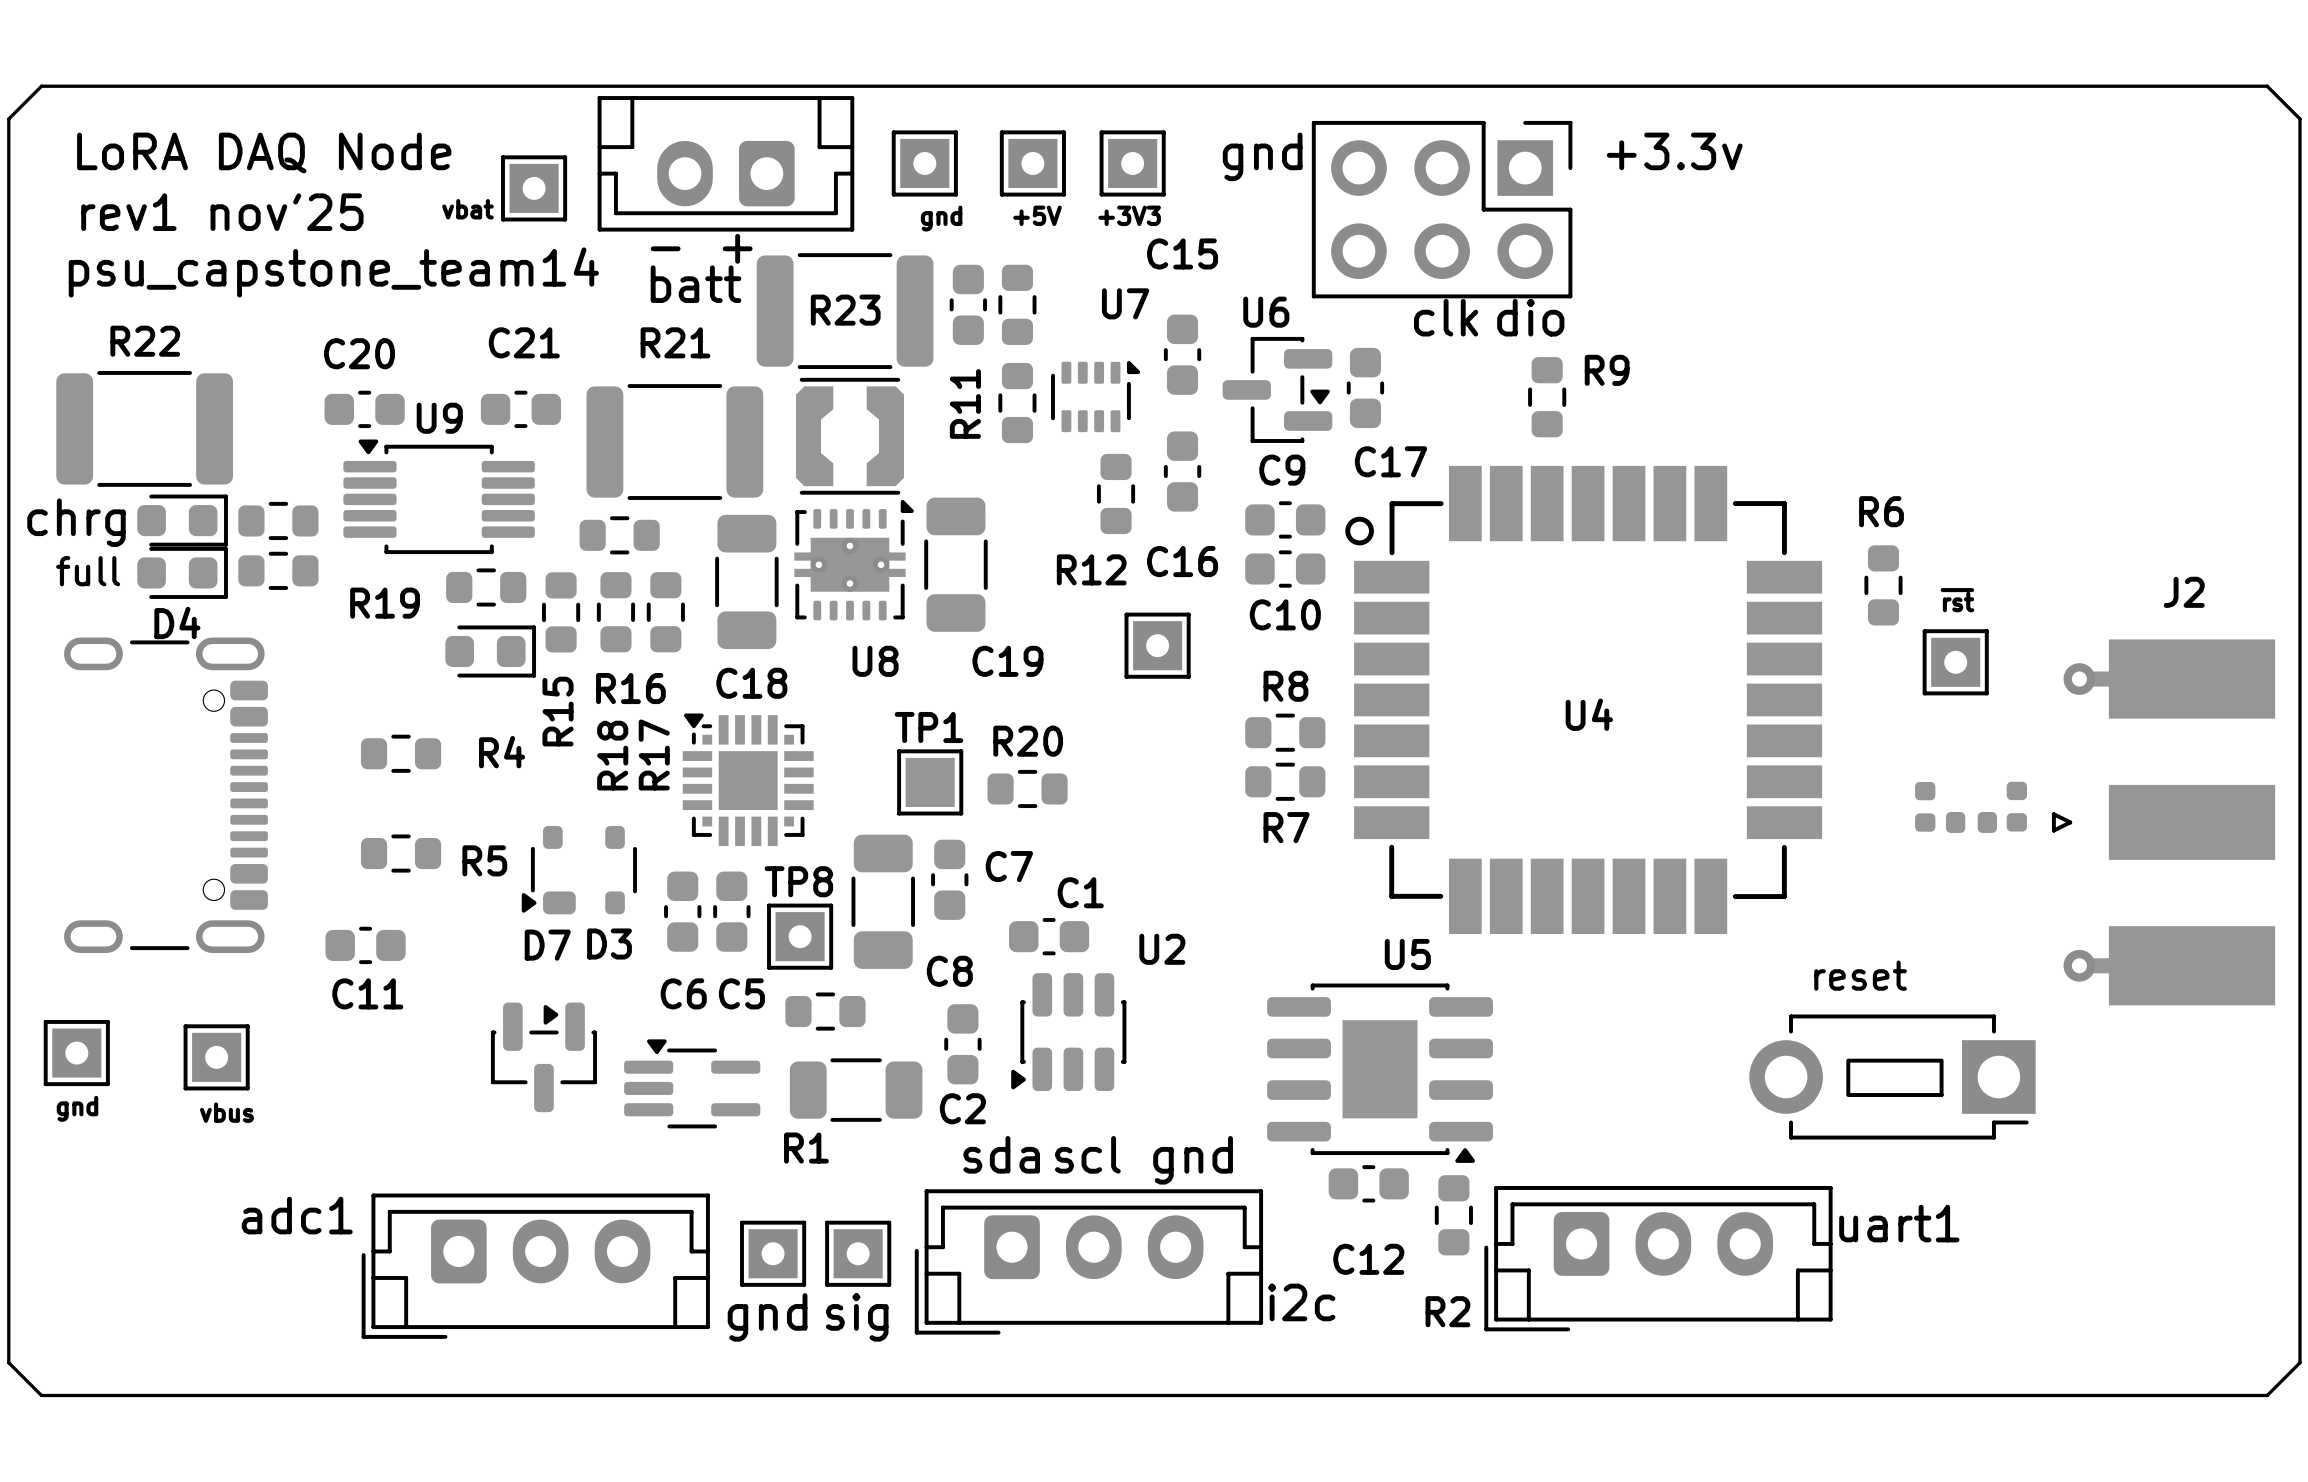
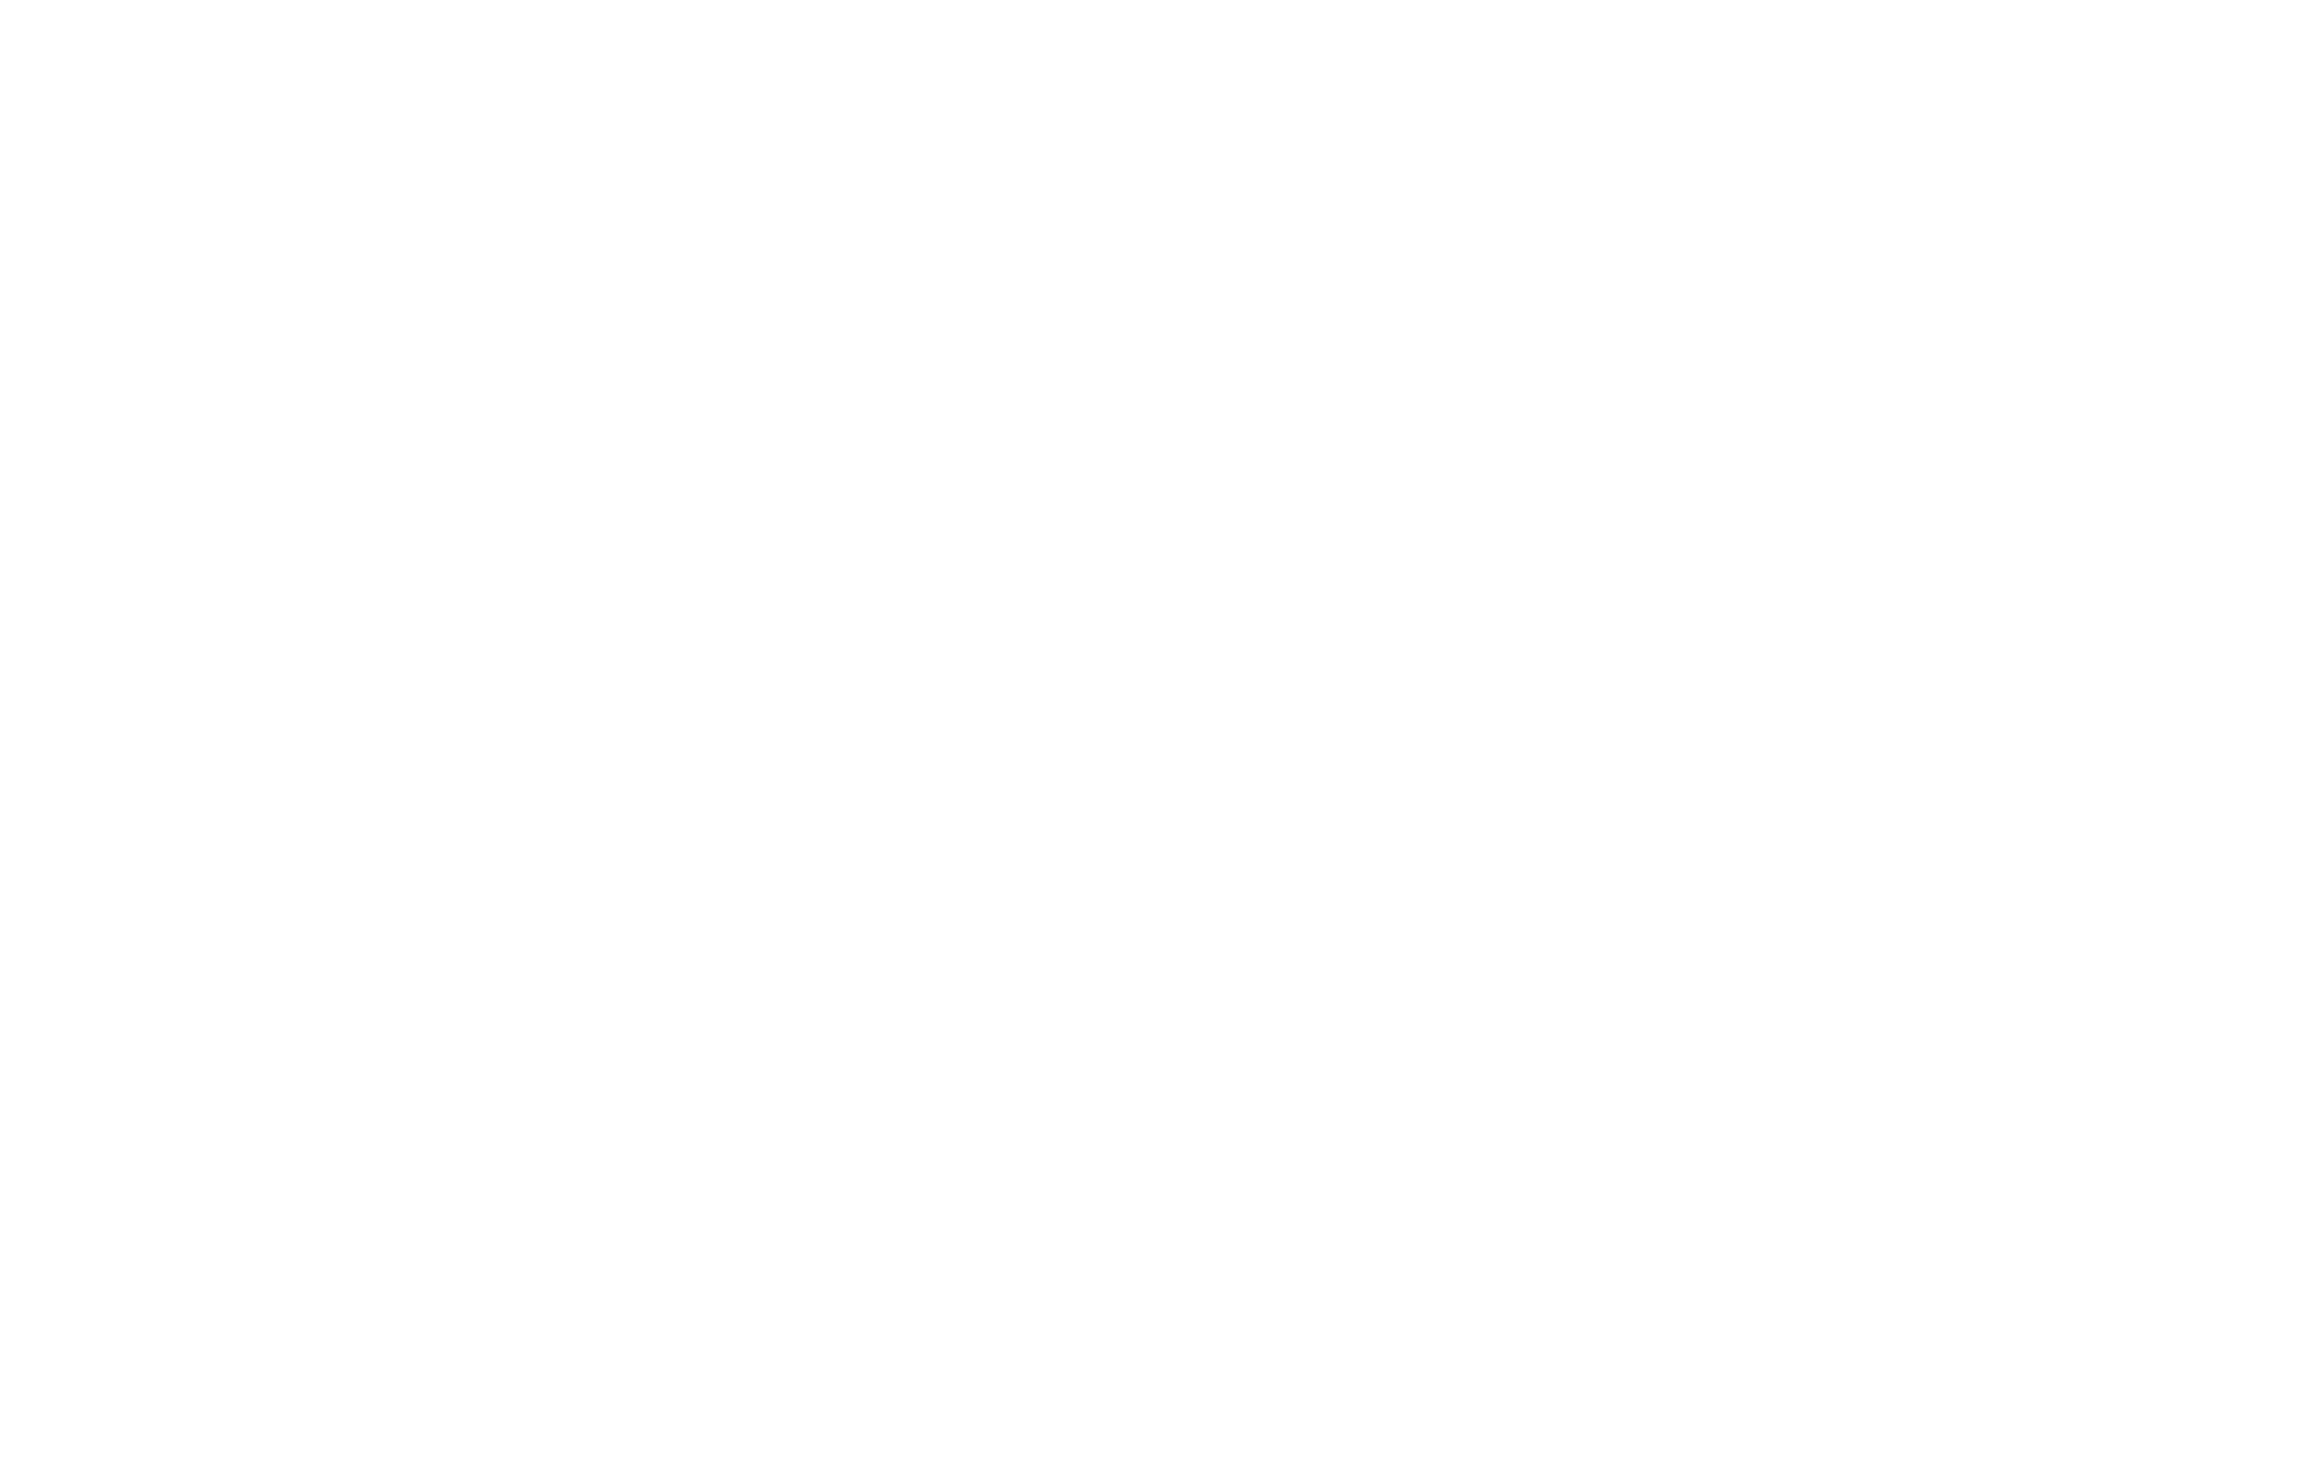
board edge: (41, 86) (8, 118) (8, 1362) (41, 1395) (2267, 1395) (2299, 1362) (2299, 118) (2267, 86) (41, 86) -> none
text: +3.3v (1674, 151) -> none
text: LoRA DAQ Node (264, 152) -> none
text: gnd (1262, 156) -> none
part: (725, 163) -> none
part: (924, 163) -> none
part: (1032, 163) -> none
part: (1132, 163) -> none
part: (534, 188) -> none
text: vbat (468, 209) -> none
part: (1442, 209) -> none
text: rev1 nov'25 (222, 212) -> none
text: +5V (1037, 215) -> none
text: +3V3 (1129, 215) -> none
text: gnd (941, 218) -> none
text: - (665, 248) -> none
text: + (737, 248) -> none
text: psu_capstone_team14 (333, 272) -> none
text: batt (696, 284) -> none
part: (968, 304) -> none
part: (1017, 304) -> none
R23: (845, 311) -> none
text: clk (1446, 317) -> none
text: dio (1530, 317) -> none
C15: (1182, 354) -> none
C17: (1365, 387) -> none
U6: (1277, 389) -> none
U7: (1095, 396) -> none
R9: (1547, 397) -> none
R11: (1017, 403) -> none
C20: (364, 409) -> none
C21: (520, 409) -> none
R22: (144, 428) -> none
part: (849, 436) -> none
R21: (674, 442) -> none
C16: (1182, 471) -> none
R12: (1116, 493) -> none
U9: (439, 496) -> none
C9: (1285, 519) -> none
part: (182, 520) -> none
part: (278, 520) -> none
text: chrg (76, 522) -> none
R16: (619, 535) -> none
U8: (854, 560) -> none
C19: (955, 564) -> none
C10: (1285, 569) -> none
part: (278, 570) -> none
text: full (88, 571) -> none
D4: (182, 572) -> none
C18: (746, 581) -> none
R6: (1883, 585) -> none
R19: (486, 587) -> none
text: ~{rst} (1957, 600) -> none
R15: (561, 612) -> none
R18: (615, 612) -> none
R17: (665, 612) -> none
part: (1157, 645) -> none
part: (490, 651) -> none
part: (1955, 662) -> none
U4: (1583, 699) -> none
R8: (1285, 732) -> none
R4: (401, 753) -> none
part: (748, 779) -> none
R7: (1285, 781) -> none
TP1: (930, 782) -> none
R20: (1027, 788) -> none
part: (165, 795) -> none
part: (1925, 806) -> none
part: (2016, 806) -> none
part: (1971, 822) -> none
J2: (2163, 822) -> none
R5: (401, 853) -> none
D3: (579, 870) -> none
C7: (949, 879) -> none
C8: (883, 901) -> none
C6: (682, 911) -> none
C5: (731, 911) -> none
TP8: (800, 936) -> none
C1: (1049, 936) -> none
C11: (365, 945) -> none
text: reset (1860, 975) -> none
part: (825, 1011) -> none
U2: (1068, 1032) -> none
C2: (962, 1044) -> none
part: (76, 1053) -> none
part: (216, 1057) -> none
D7: (543, 1057) -> none
U5: (1380, 1073) -> none
part: (1892, 1077) -> none
part: (692, 1083) -> none
R1: (856, 1090) -> none
text: gnd (77, 1108) -> none
text: vbus (226, 1112) -> none
text: sda (1001, 1154) -> none
text: scl (1087, 1154) -> none
text: gnd (1193, 1160) -> none
C12: (1368, 1183) -> none
text: adc1 (297, 1215) -> none
R2: (1453, 1215) -> none
text: uart1 (1899, 1223) -> none
part: (773, 1253) -> none
part: (858, 1253) -> none
part: (1658, 1258) -> none
part: (1088, 1261) -> none
part: (535, 1266) -> none
text: i2c (1301, 1302) -> none
text: gnd (767, 1317) -> none
text: sig (857, 1317) -> none

